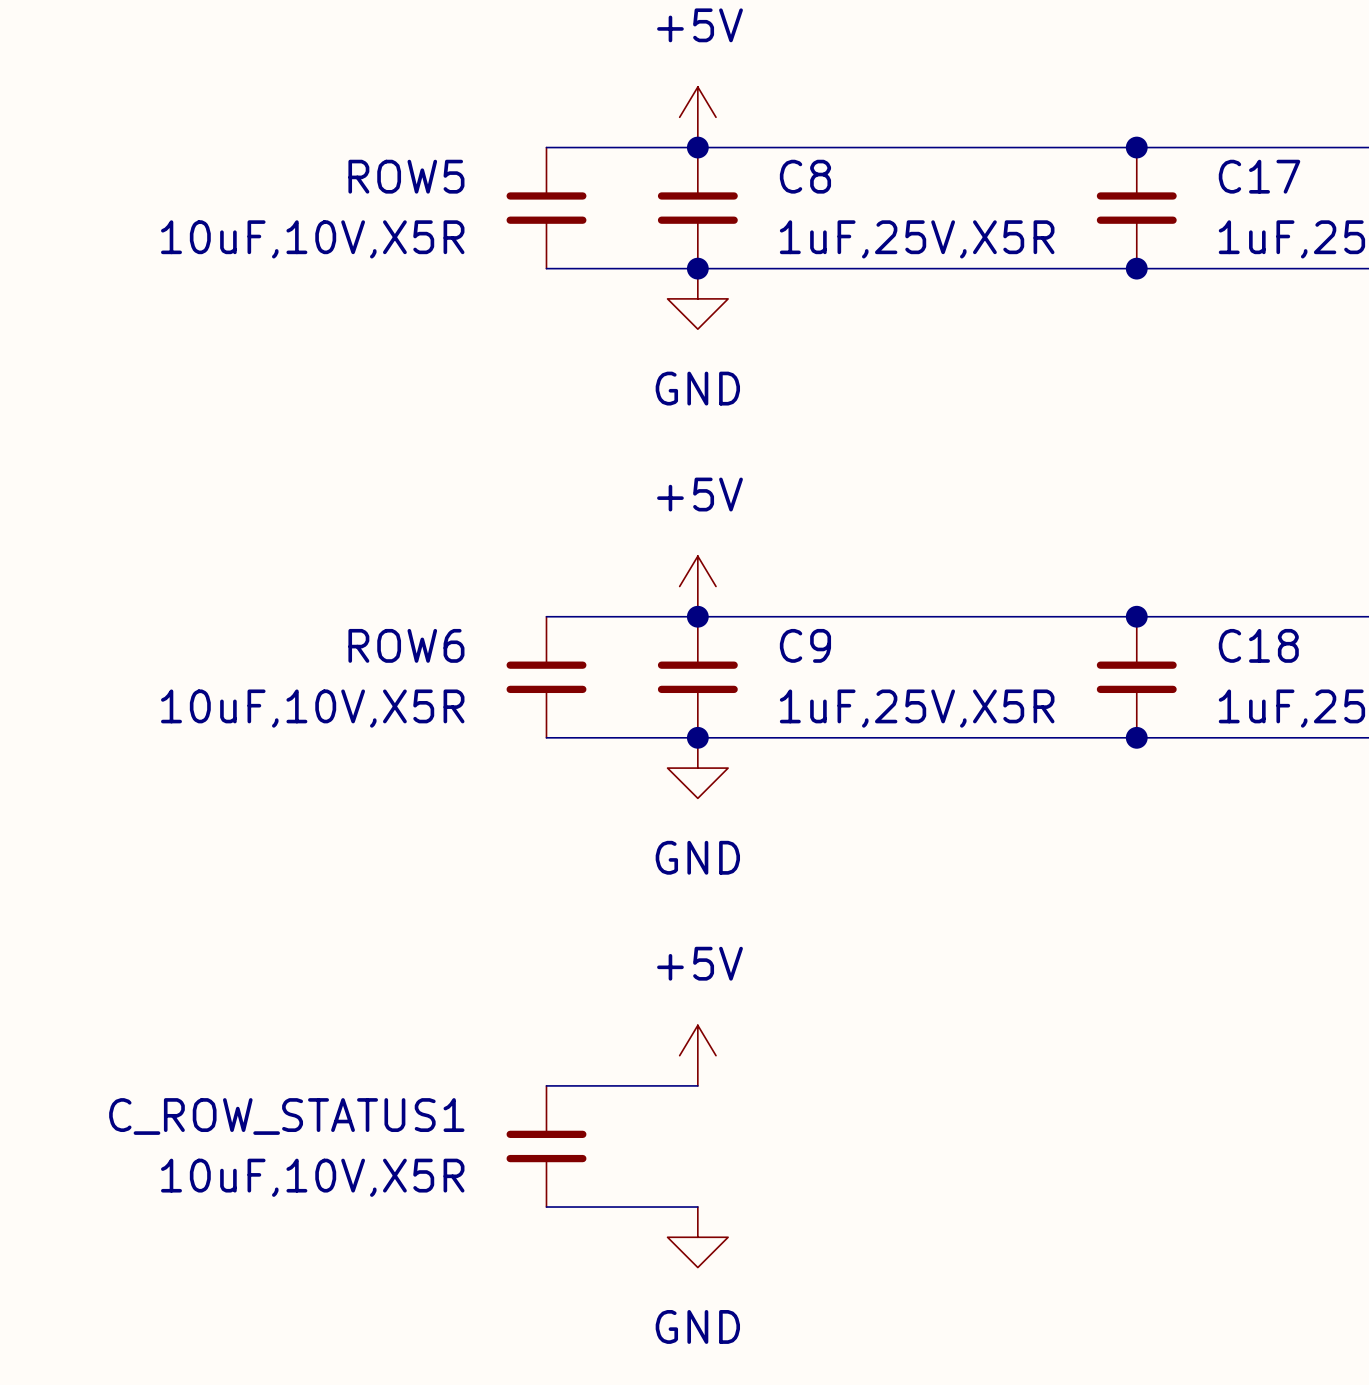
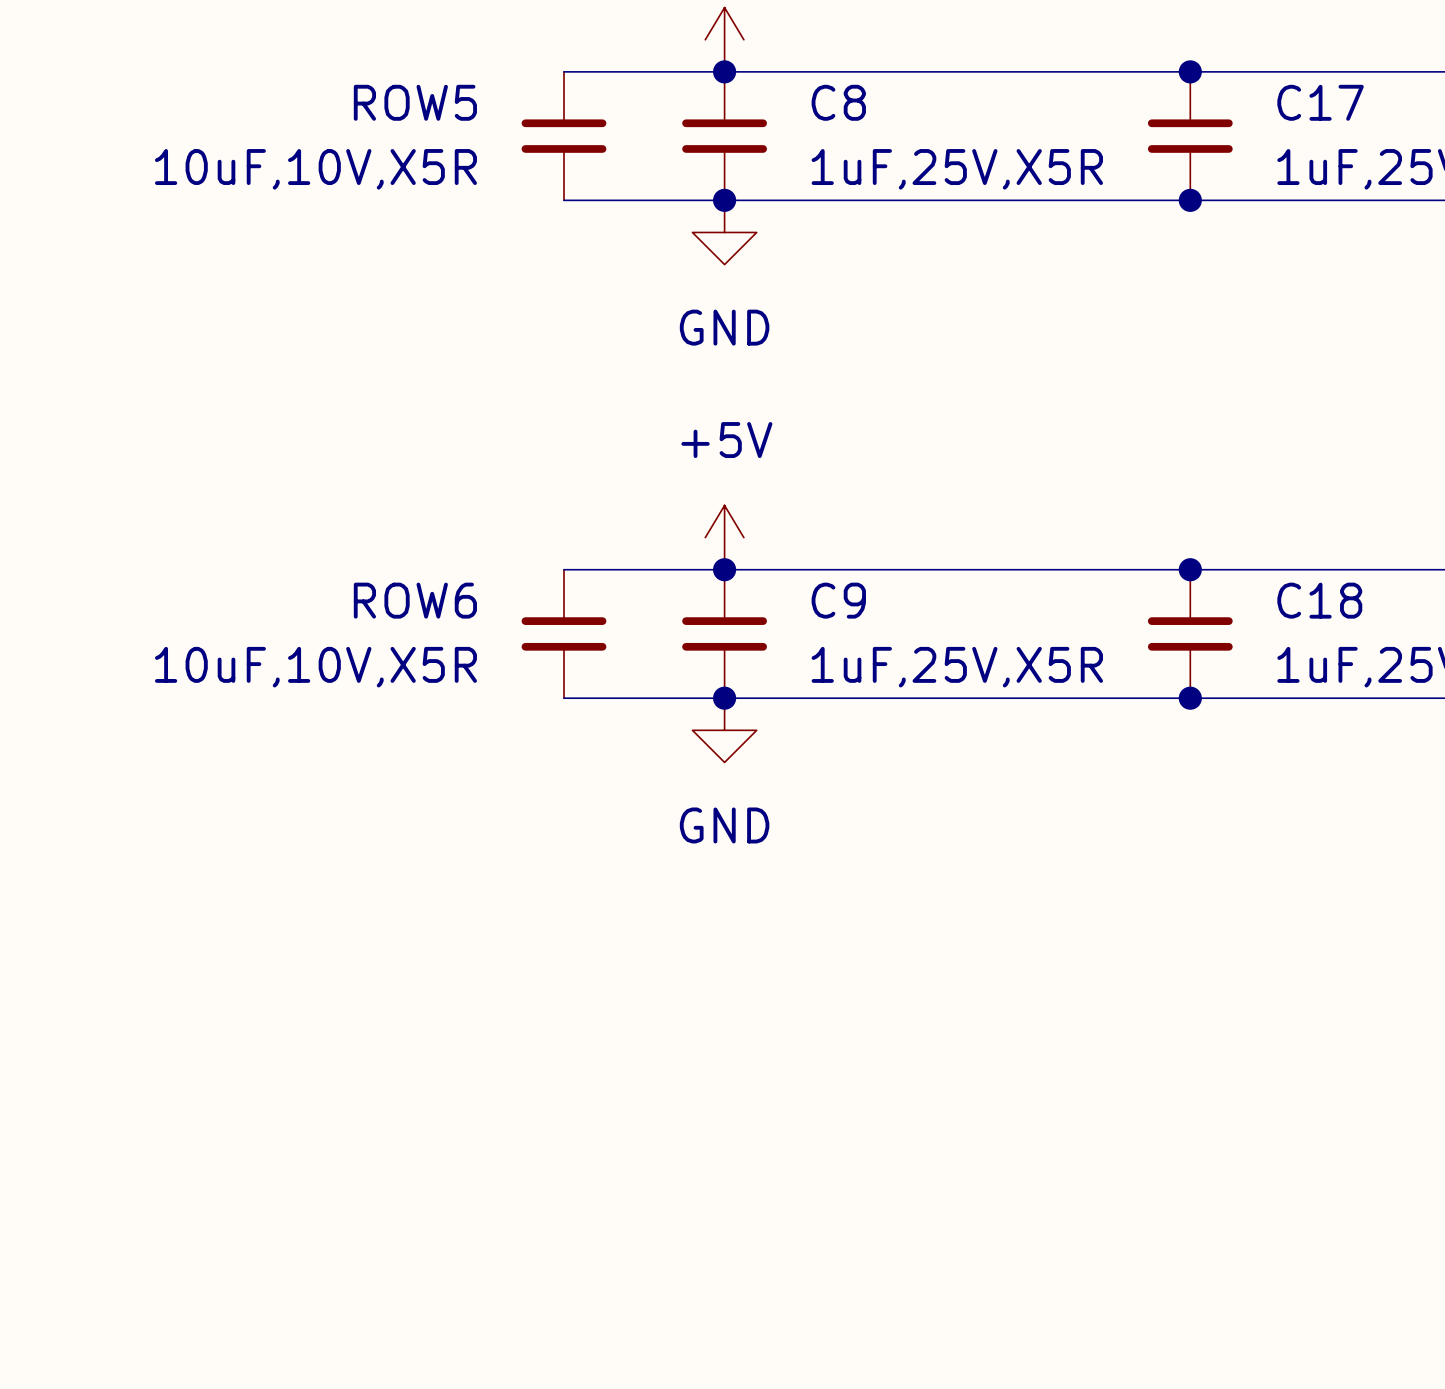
power symbol: +5V (697, 1055) -> none
wire: (546, 1085) (697, 1085) -> none
C_ROW_STATUS1: 10uF,10V,X5R (546, 1146) -> none
wire: (546, 1207) (697, 1207) -> none
power symbol: GND (697, 1237) -> none

